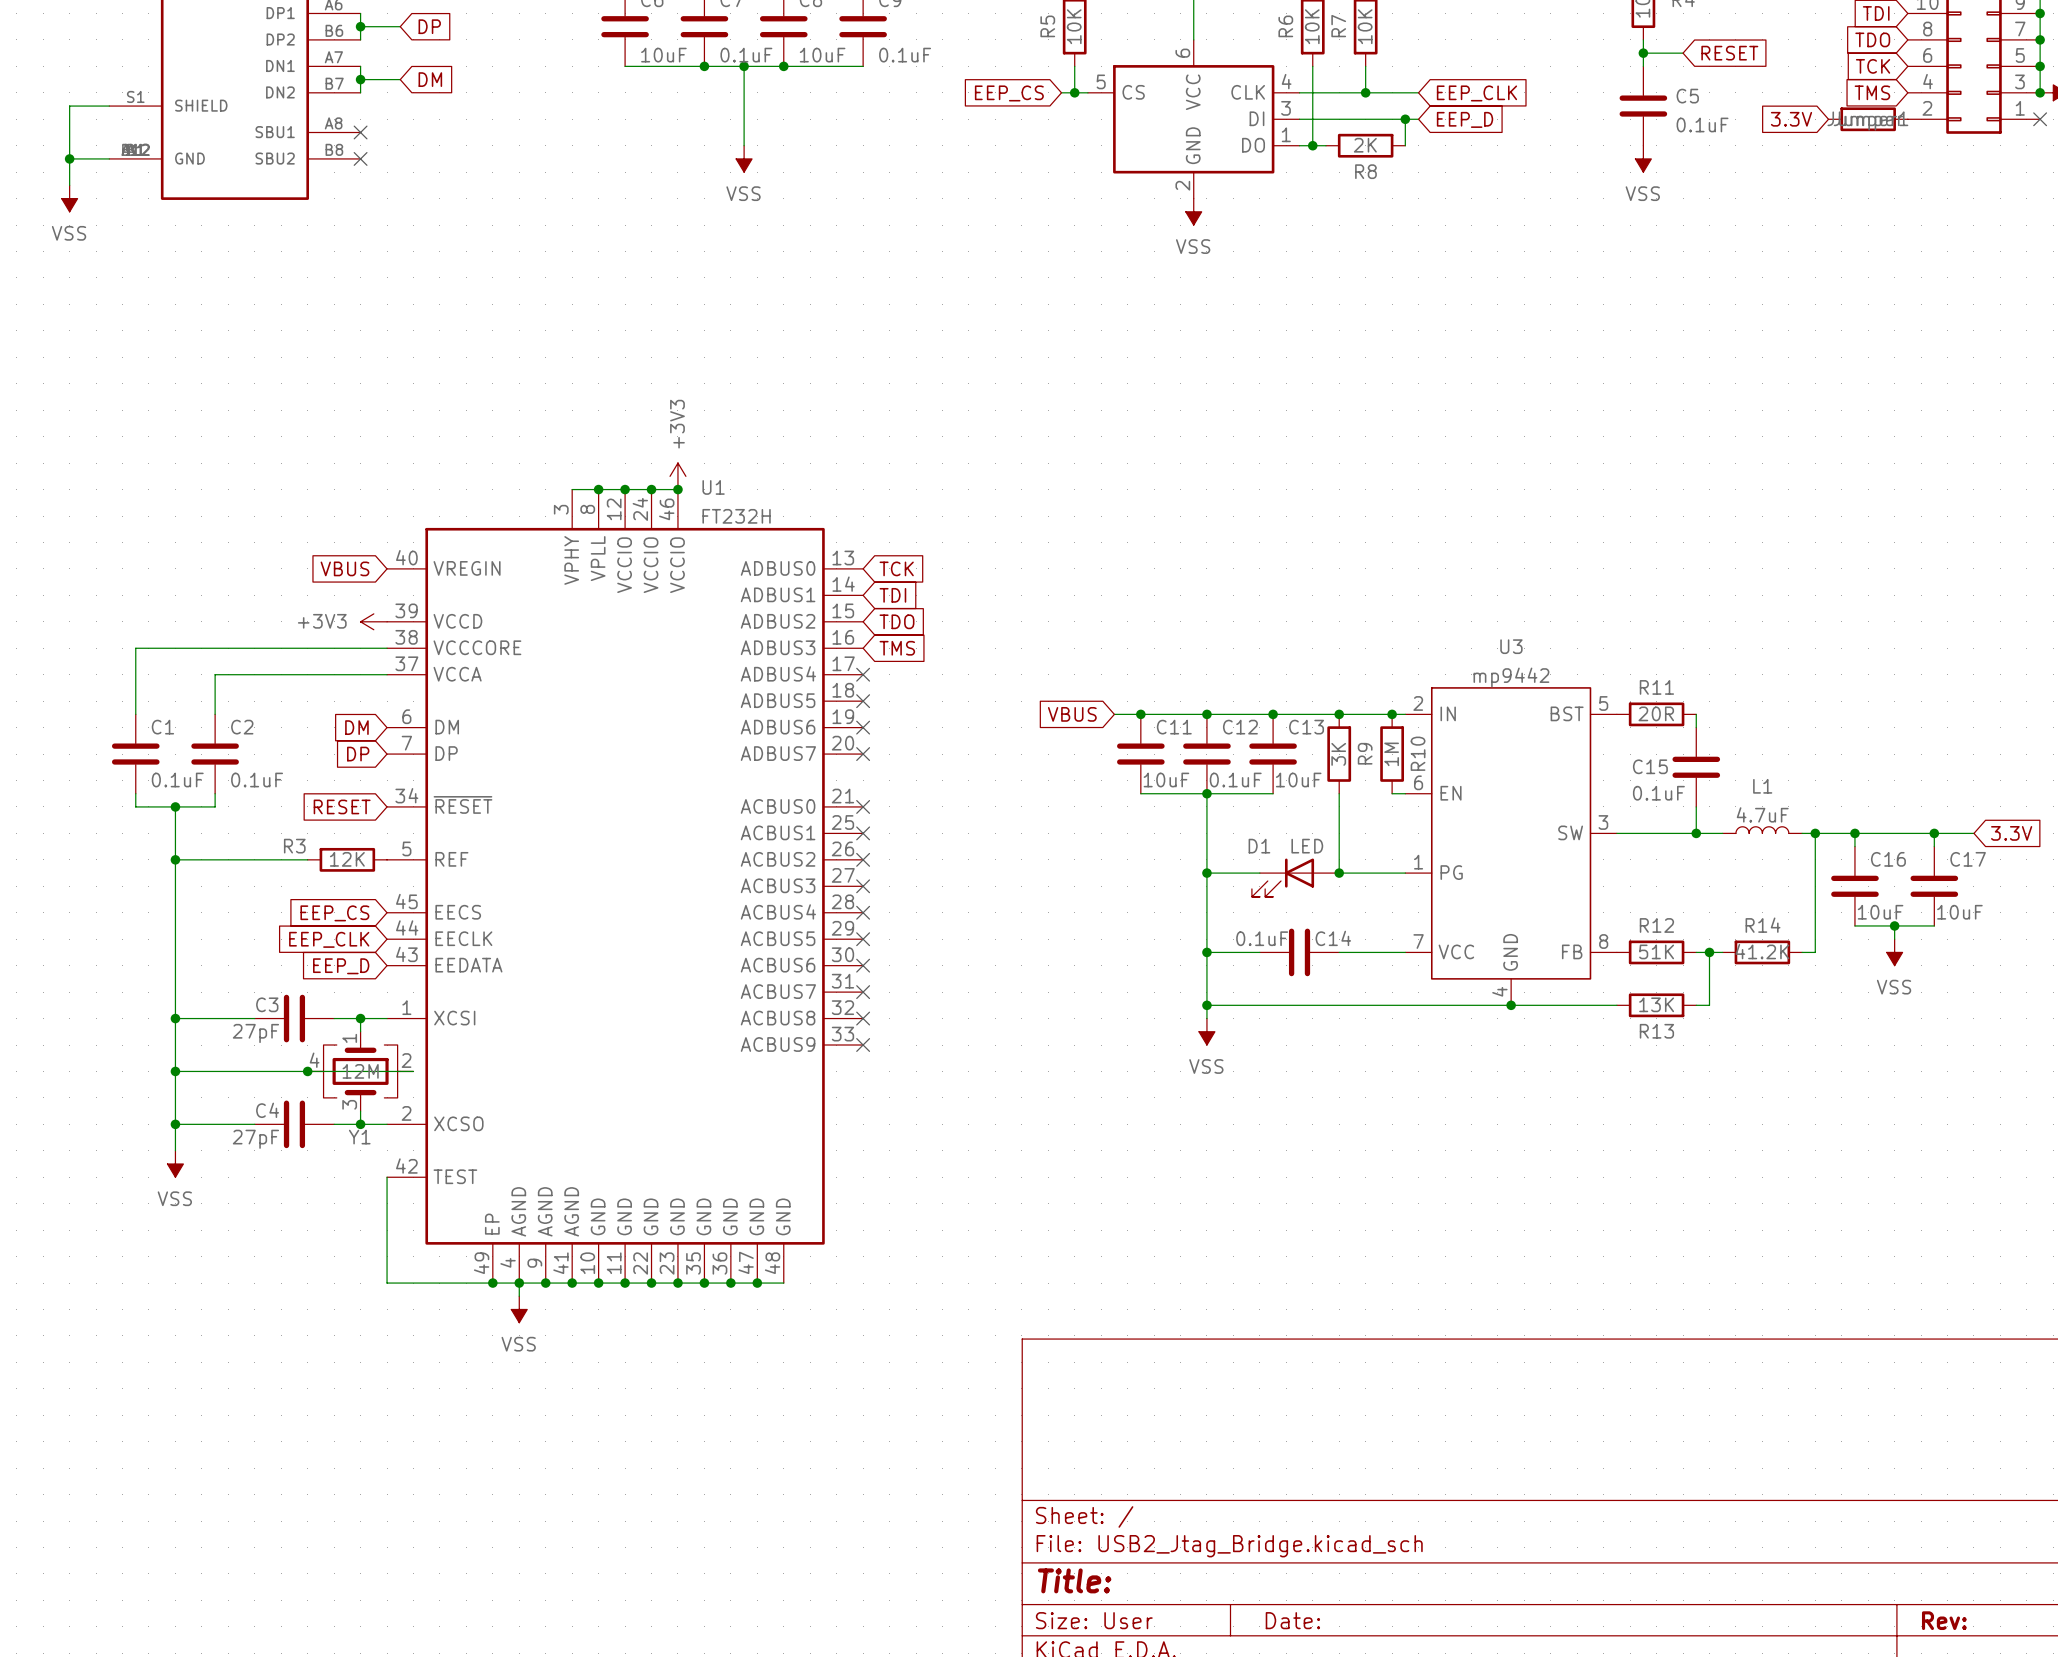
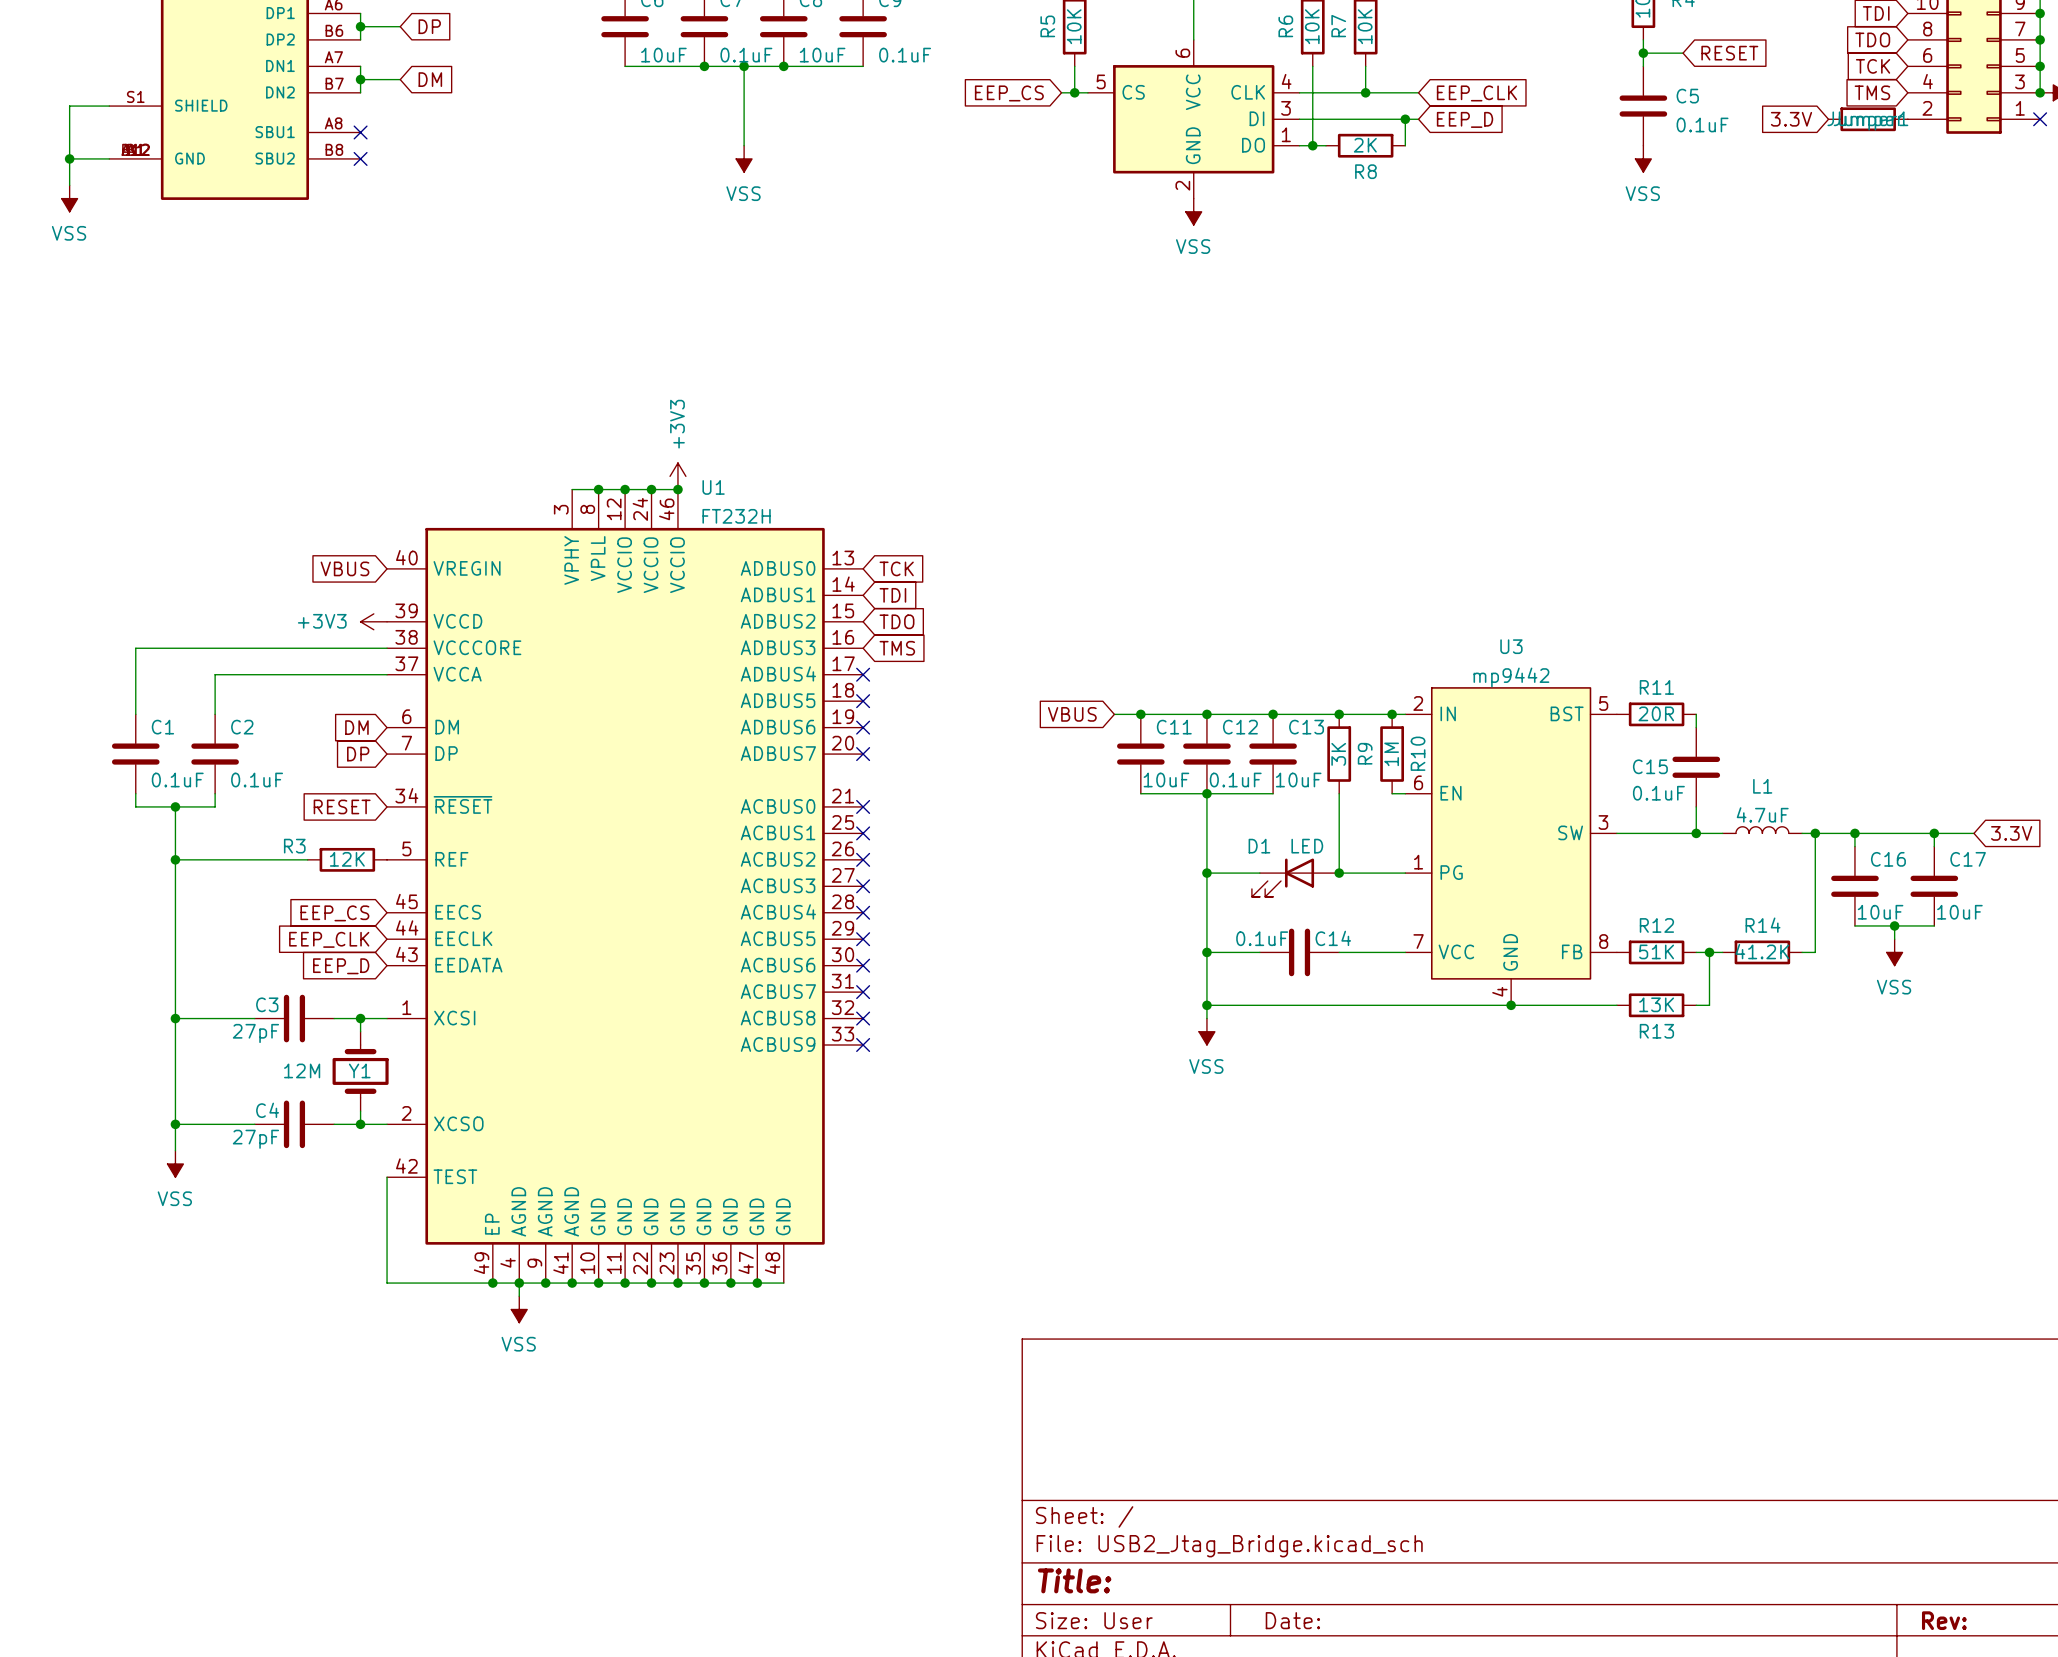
Y1 symbol: [307, 1031, 414, 1112] -> [332, 1031, 389, 1112]
wire: (175, 1071) (413, 1071) -> none
junction: (175, 1071) -> none
junction: (307, 1071) -> none
Y1 value position: 12M (360, 1071) -> 12M (302, 1070)
Y1 name position: Y1 (359, 1137) -> Y1 (359, 1070)

